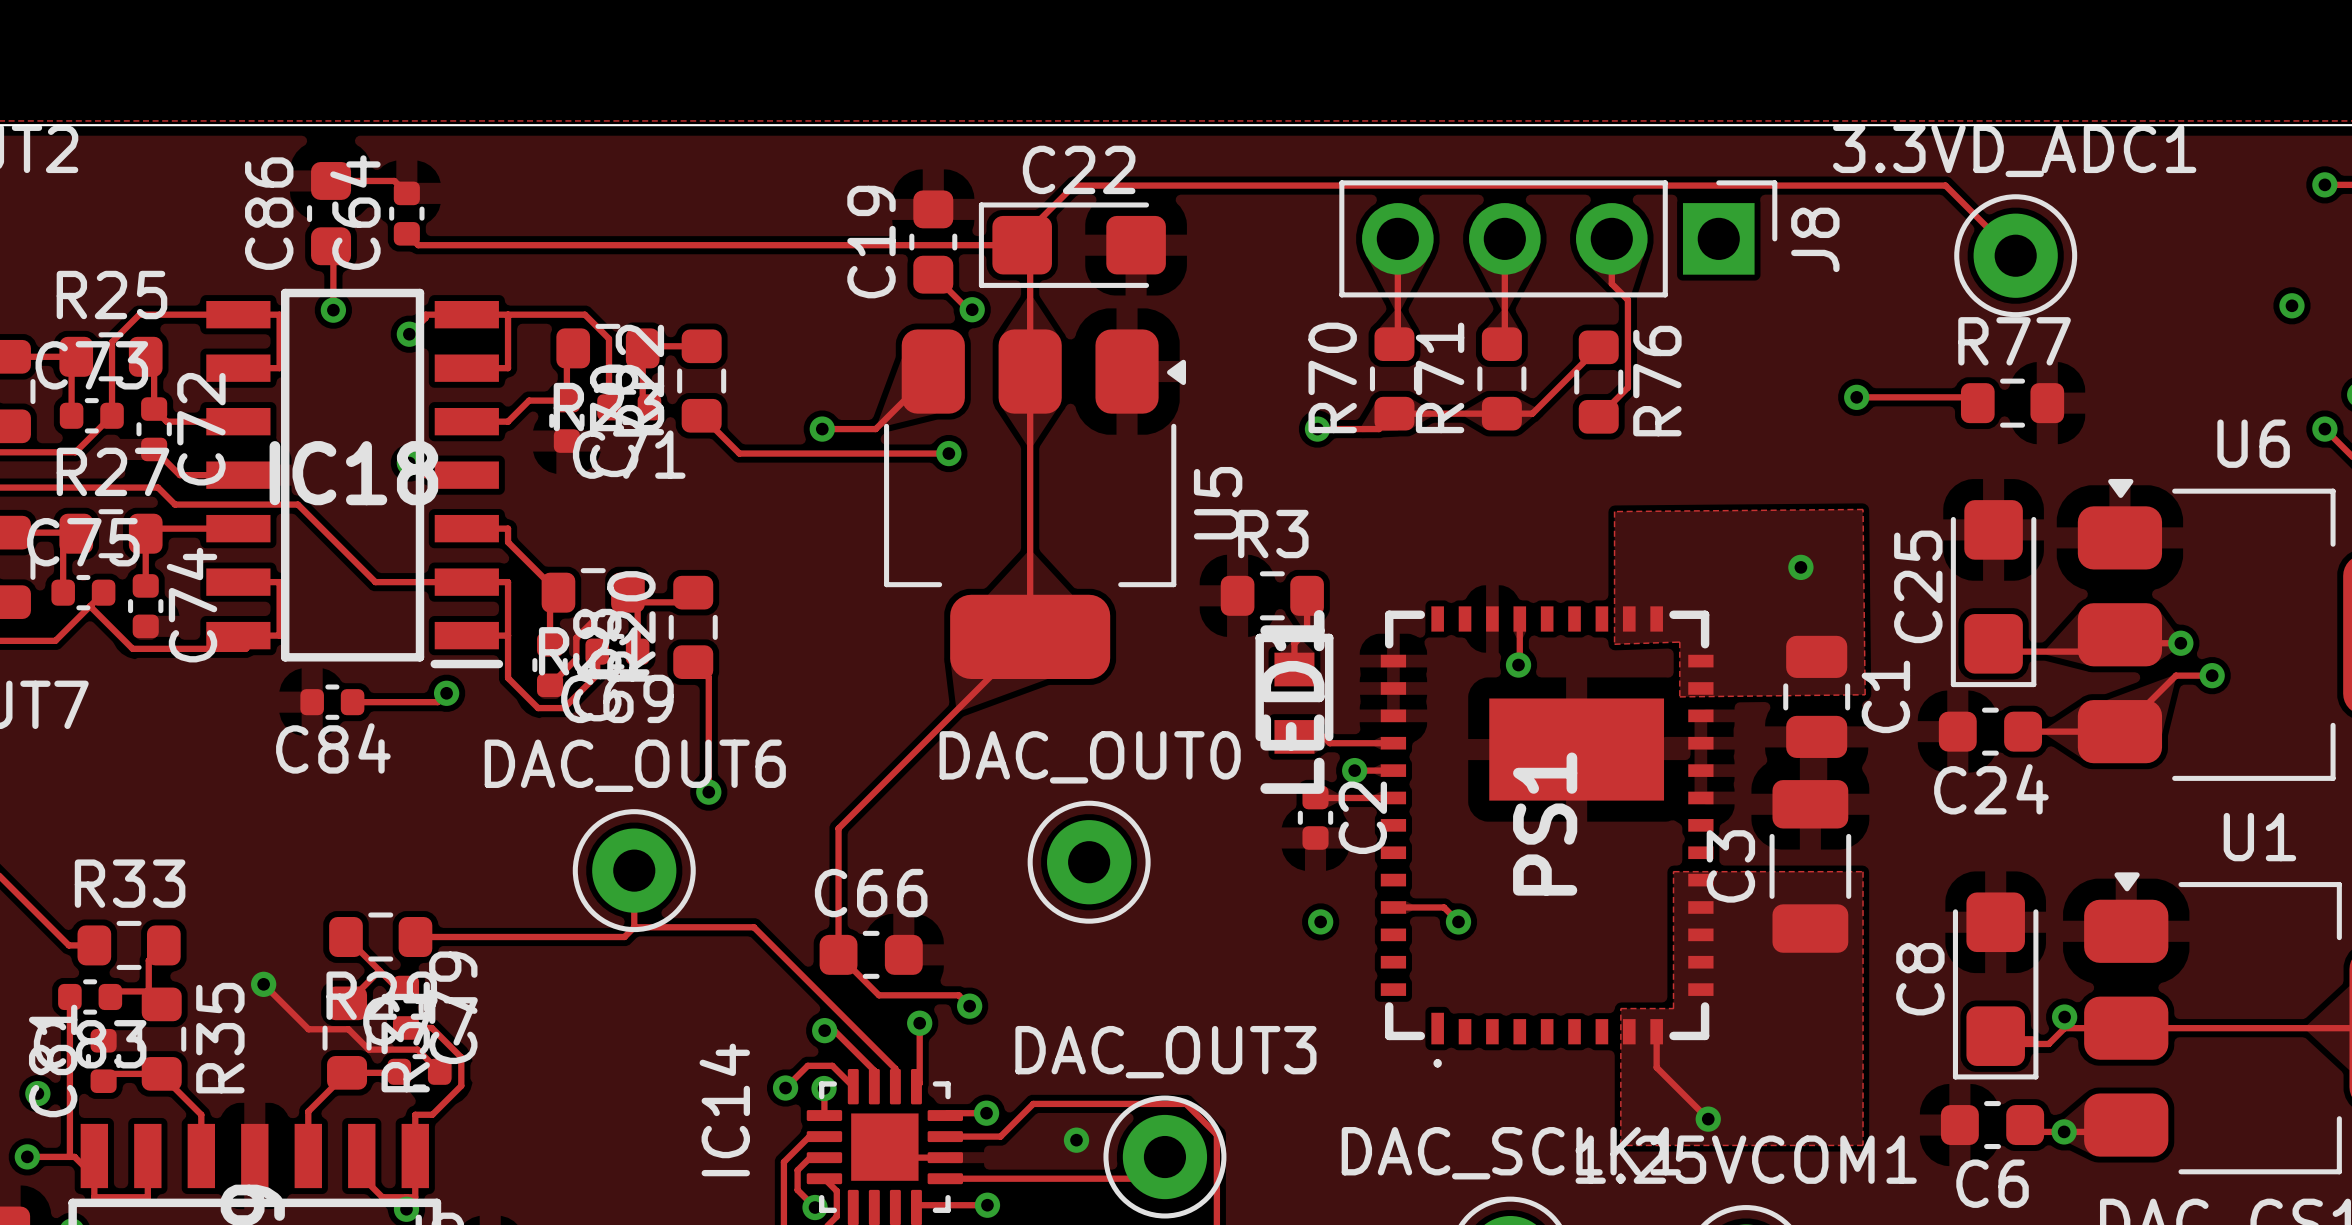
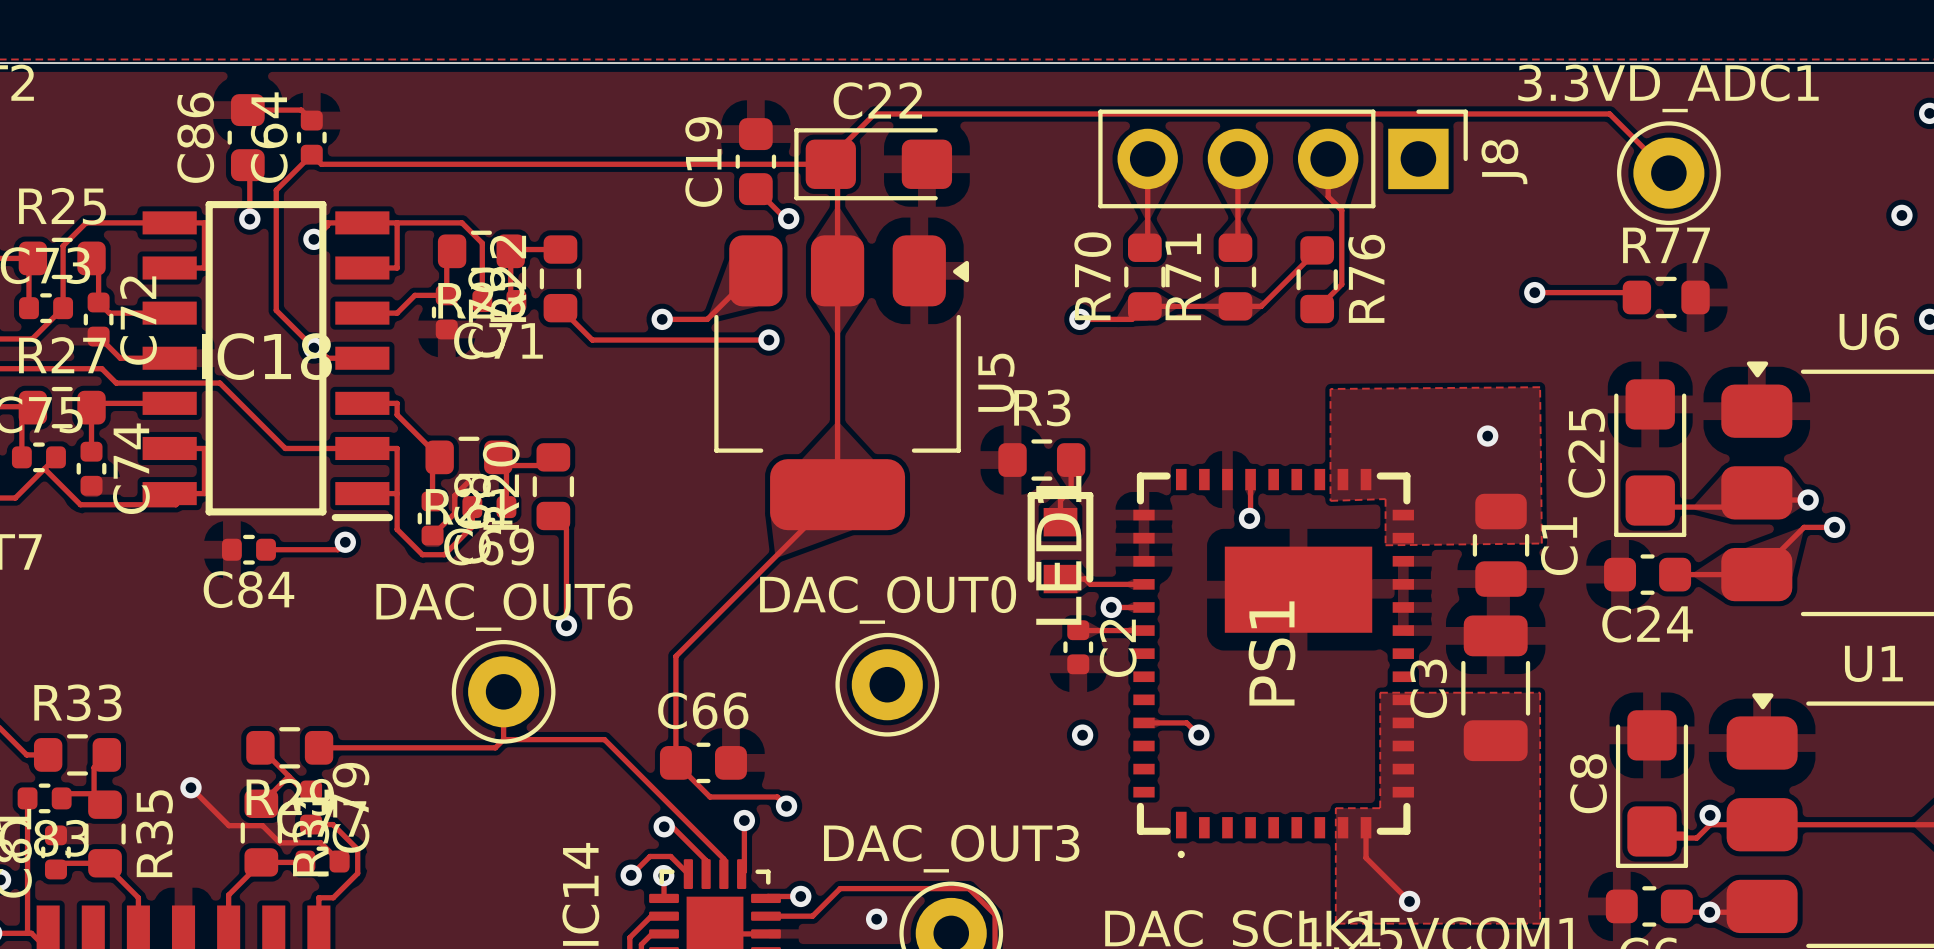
track: none -> (311, 154) (276, 190) (276, 310) (313, 348)

